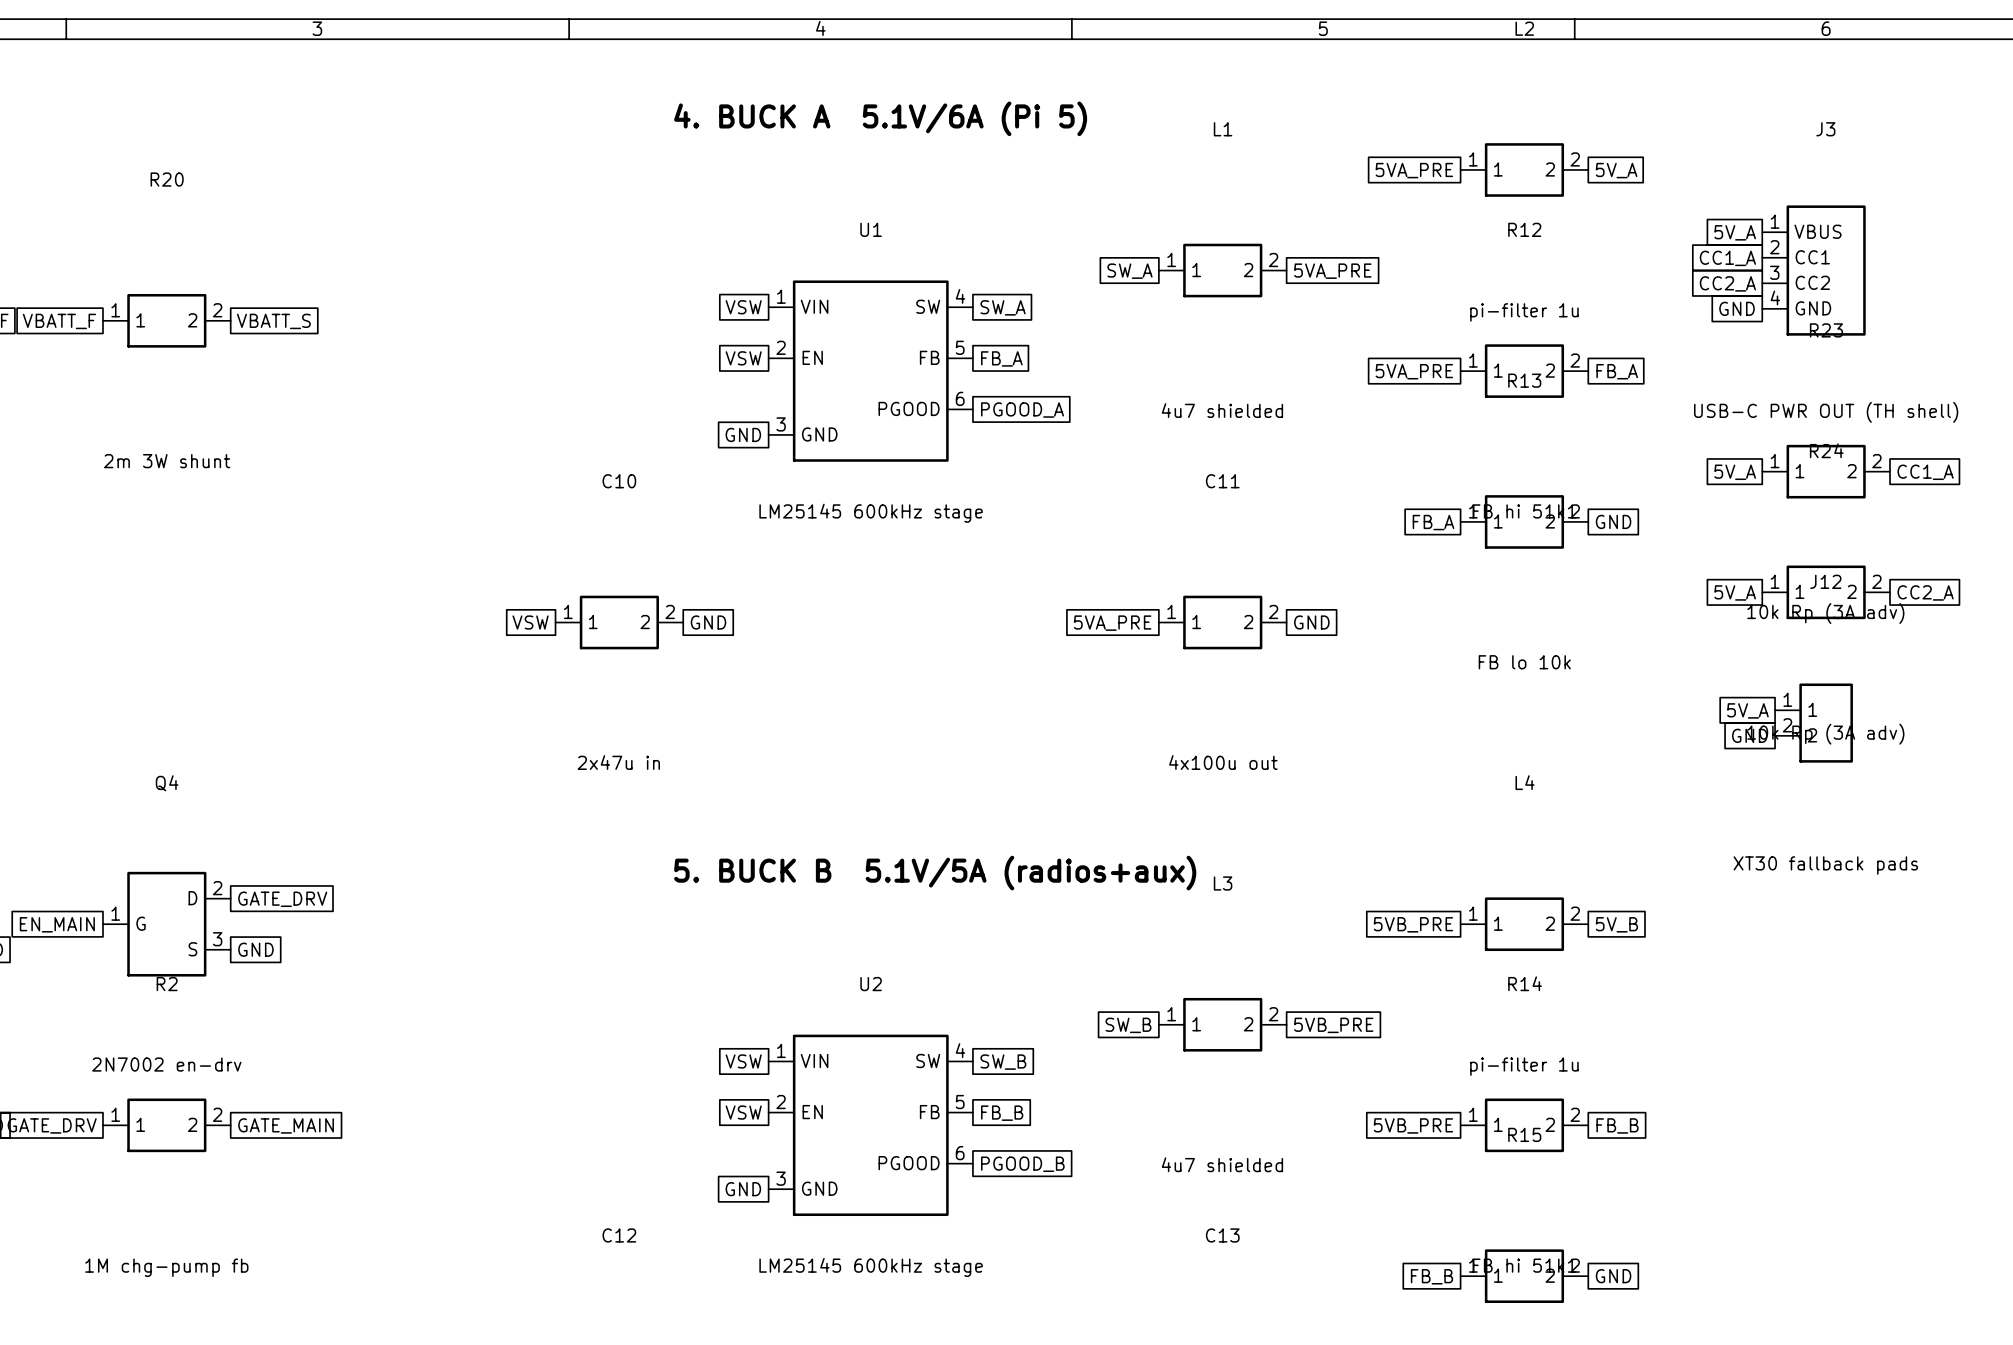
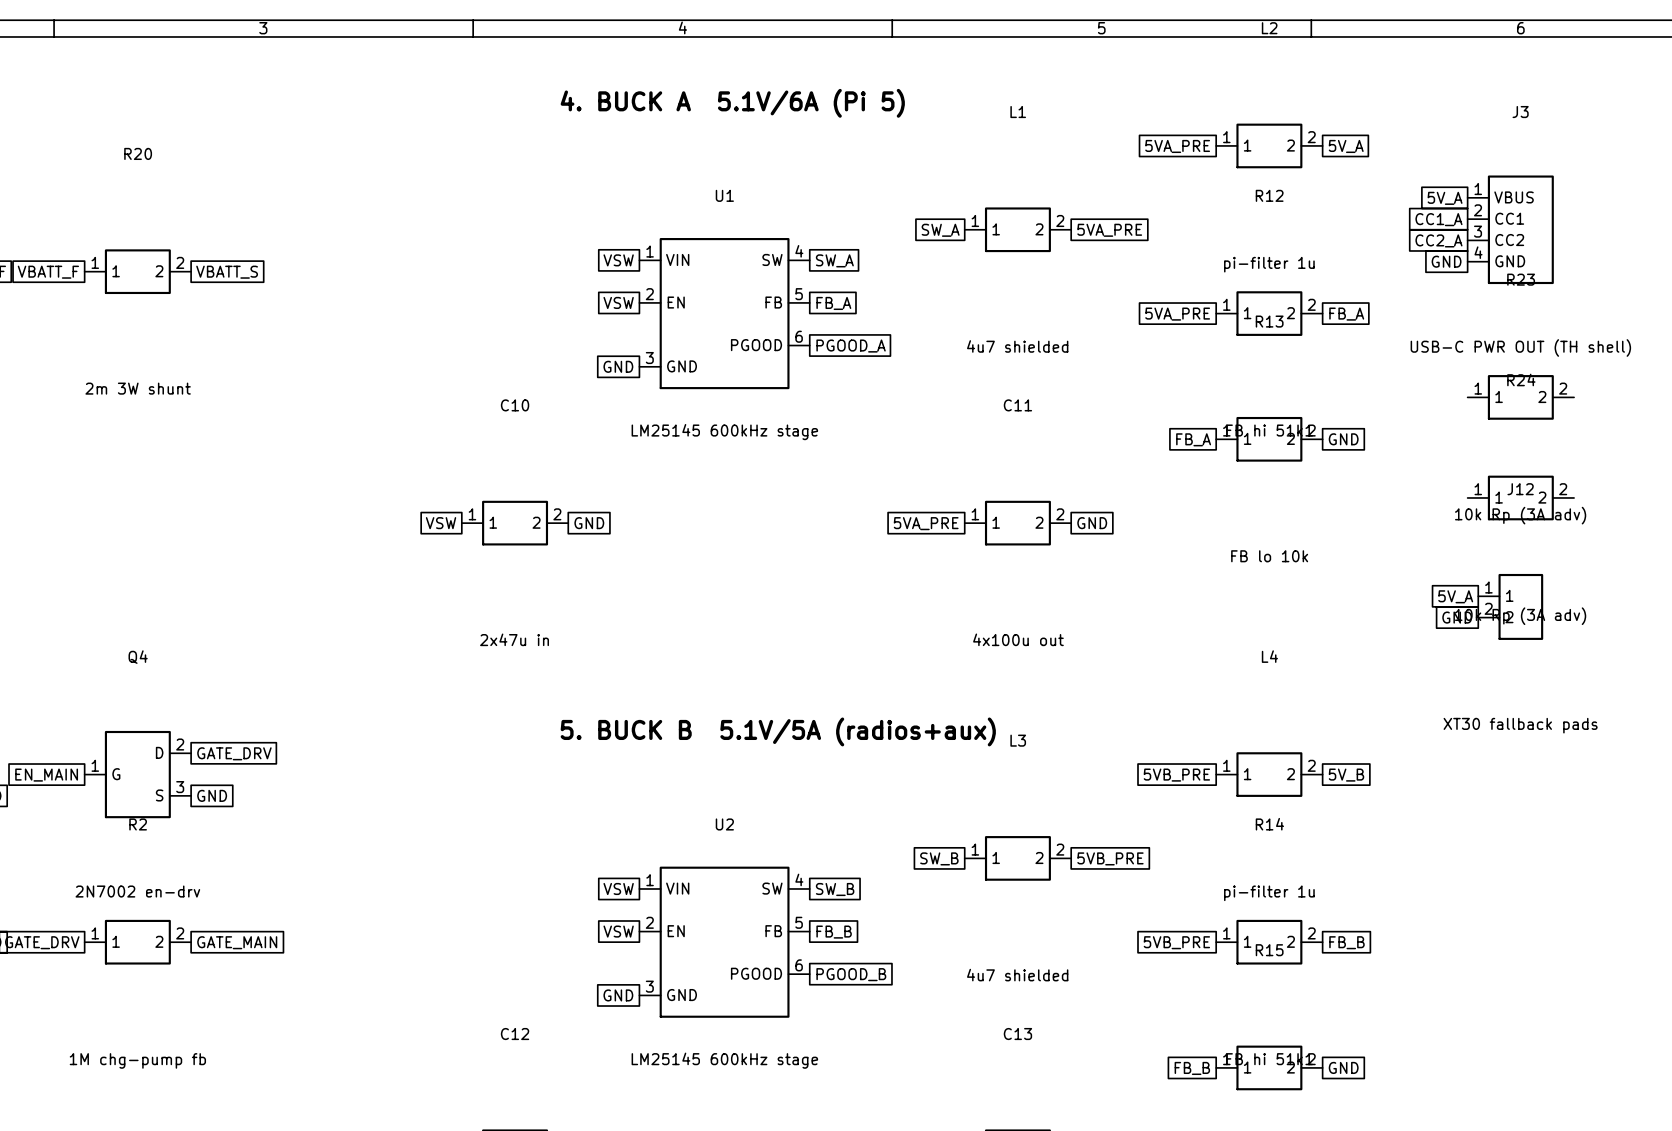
global label: 5V_A (1735, 472) -> none
global label: CC1_A (1925, 472) -> none
global label: 5V_A (1735, 592) -> none
global label: CC2_A (1925, 592) -> none

